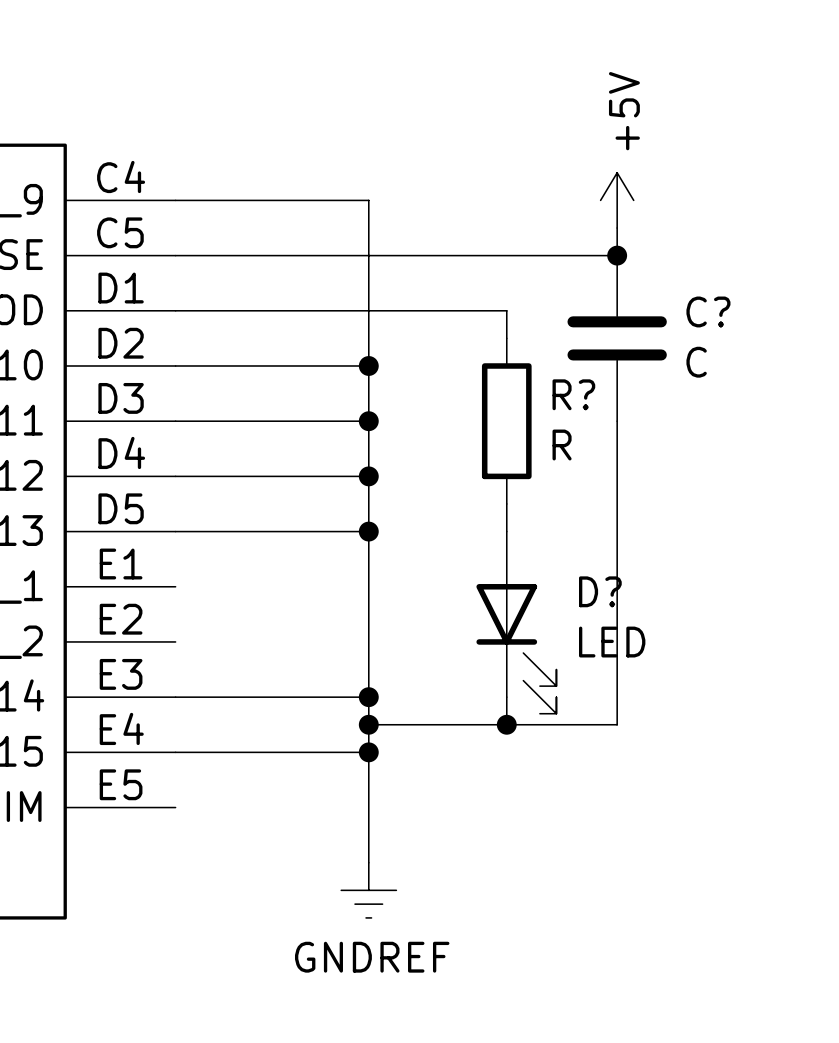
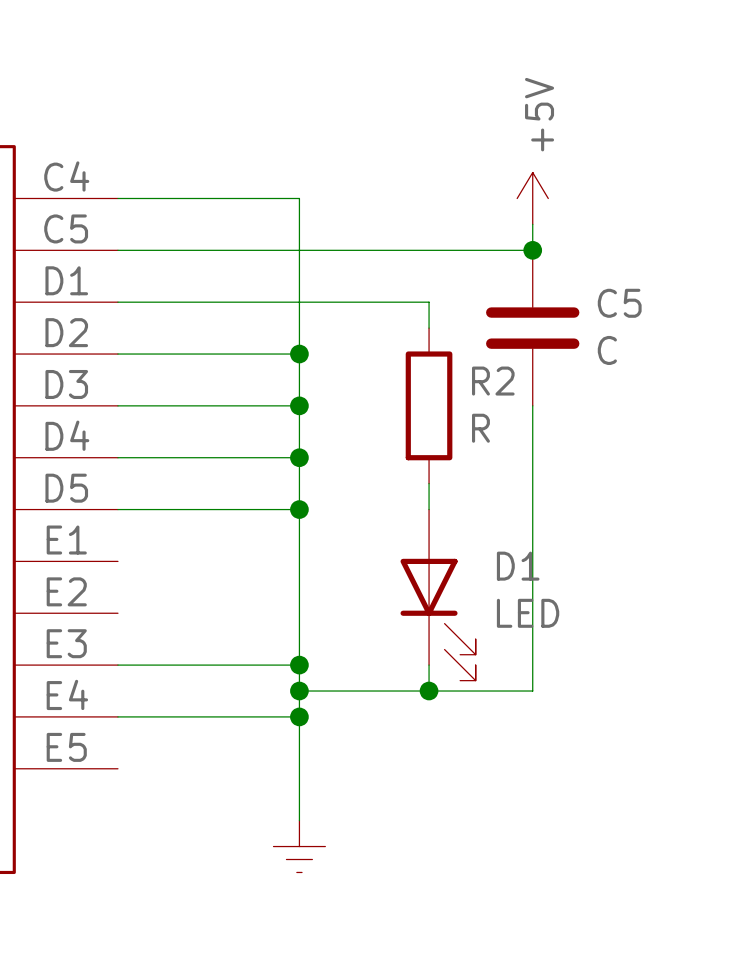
C? name: C? (708, 311) -> C5 (619, 303)
R? name: R? (573, 394) -> R2 (493, 381)
D? name: D? (600, 591) -> D1 (518, 566)
power symbol text: GNDREF (372, 957) -> none

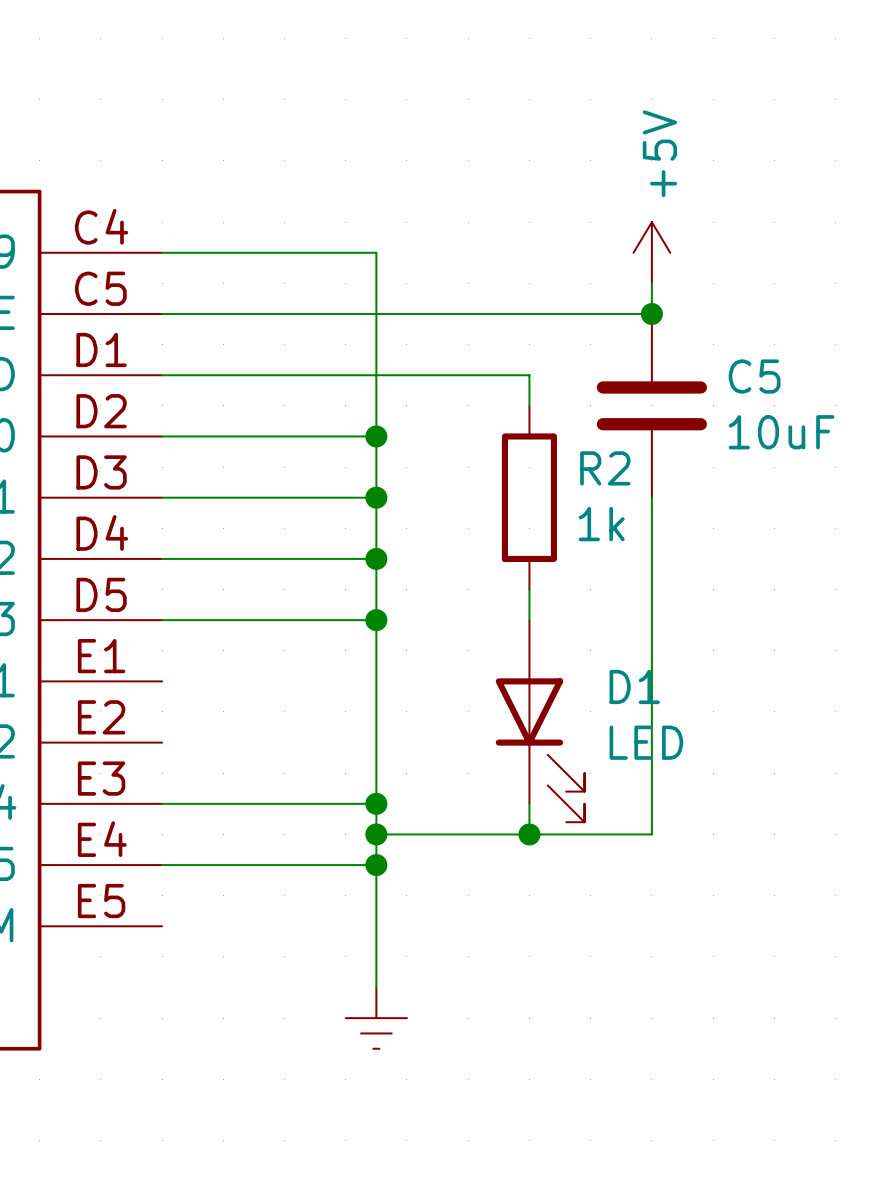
C5 value: C (607, 350) -> 10uF (781, 432)
R2 value: R (480, 428) -> 1k (601, 524)

